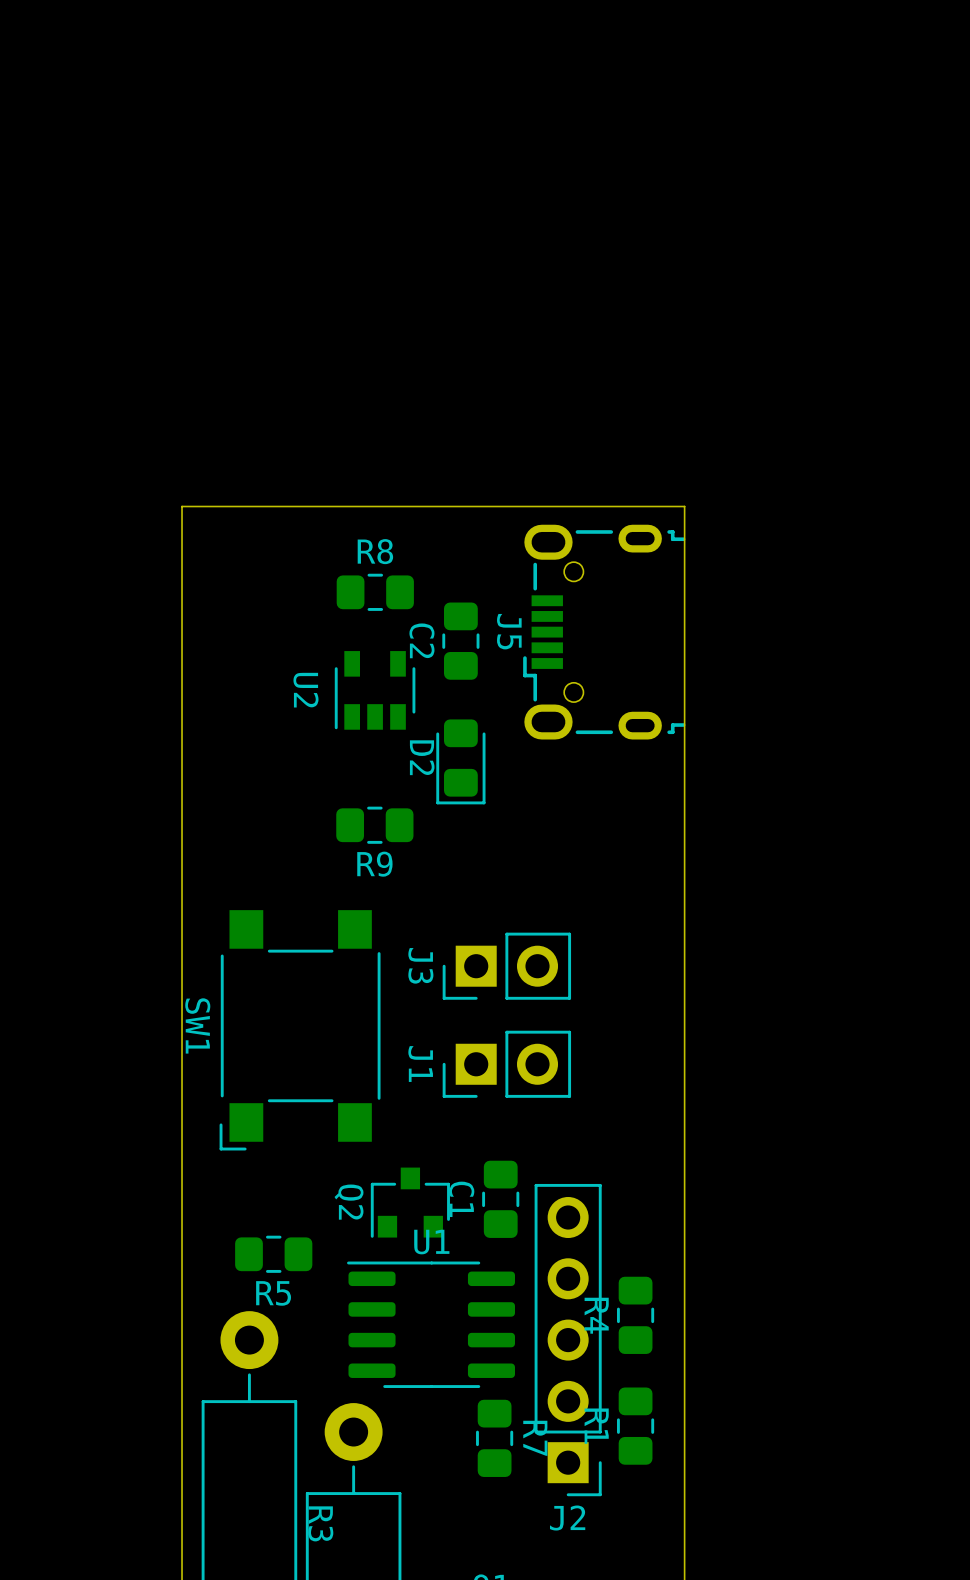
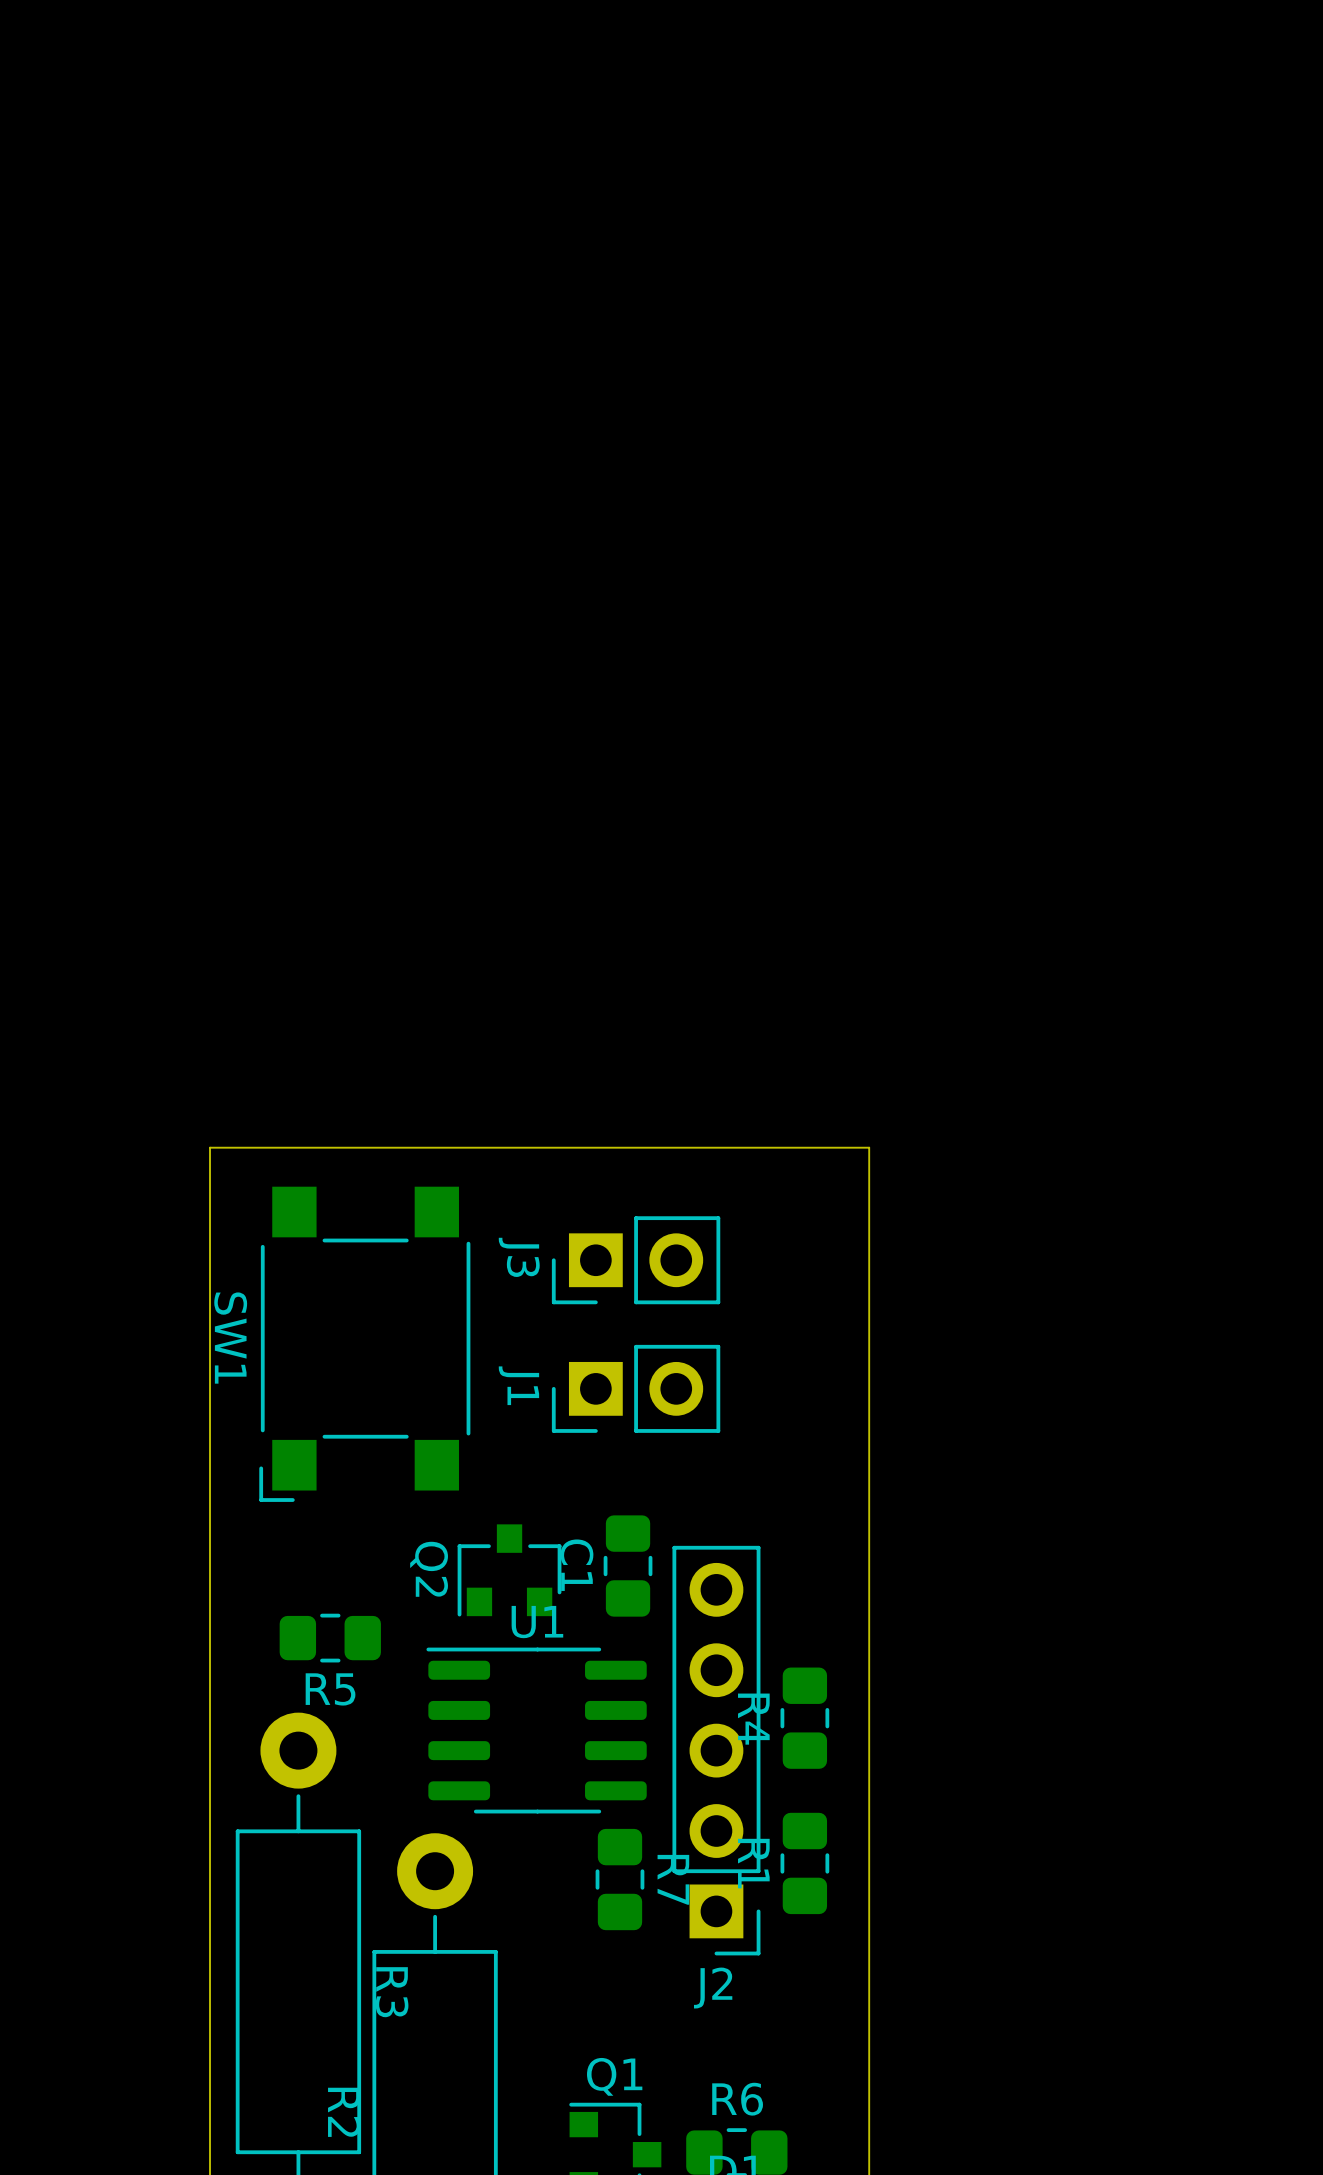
R8: (375, 592) -> none
J5: (604, 632) -> none
C2: (460, 641) -> none
U2: (375, 690) -> none
D2: (460, 761) -> none
R9: (374, 825) -> none
board edge: (684, 880) (684, 506) (182, 506) (182, 880) -> (869, 1147) (210, 1147)

